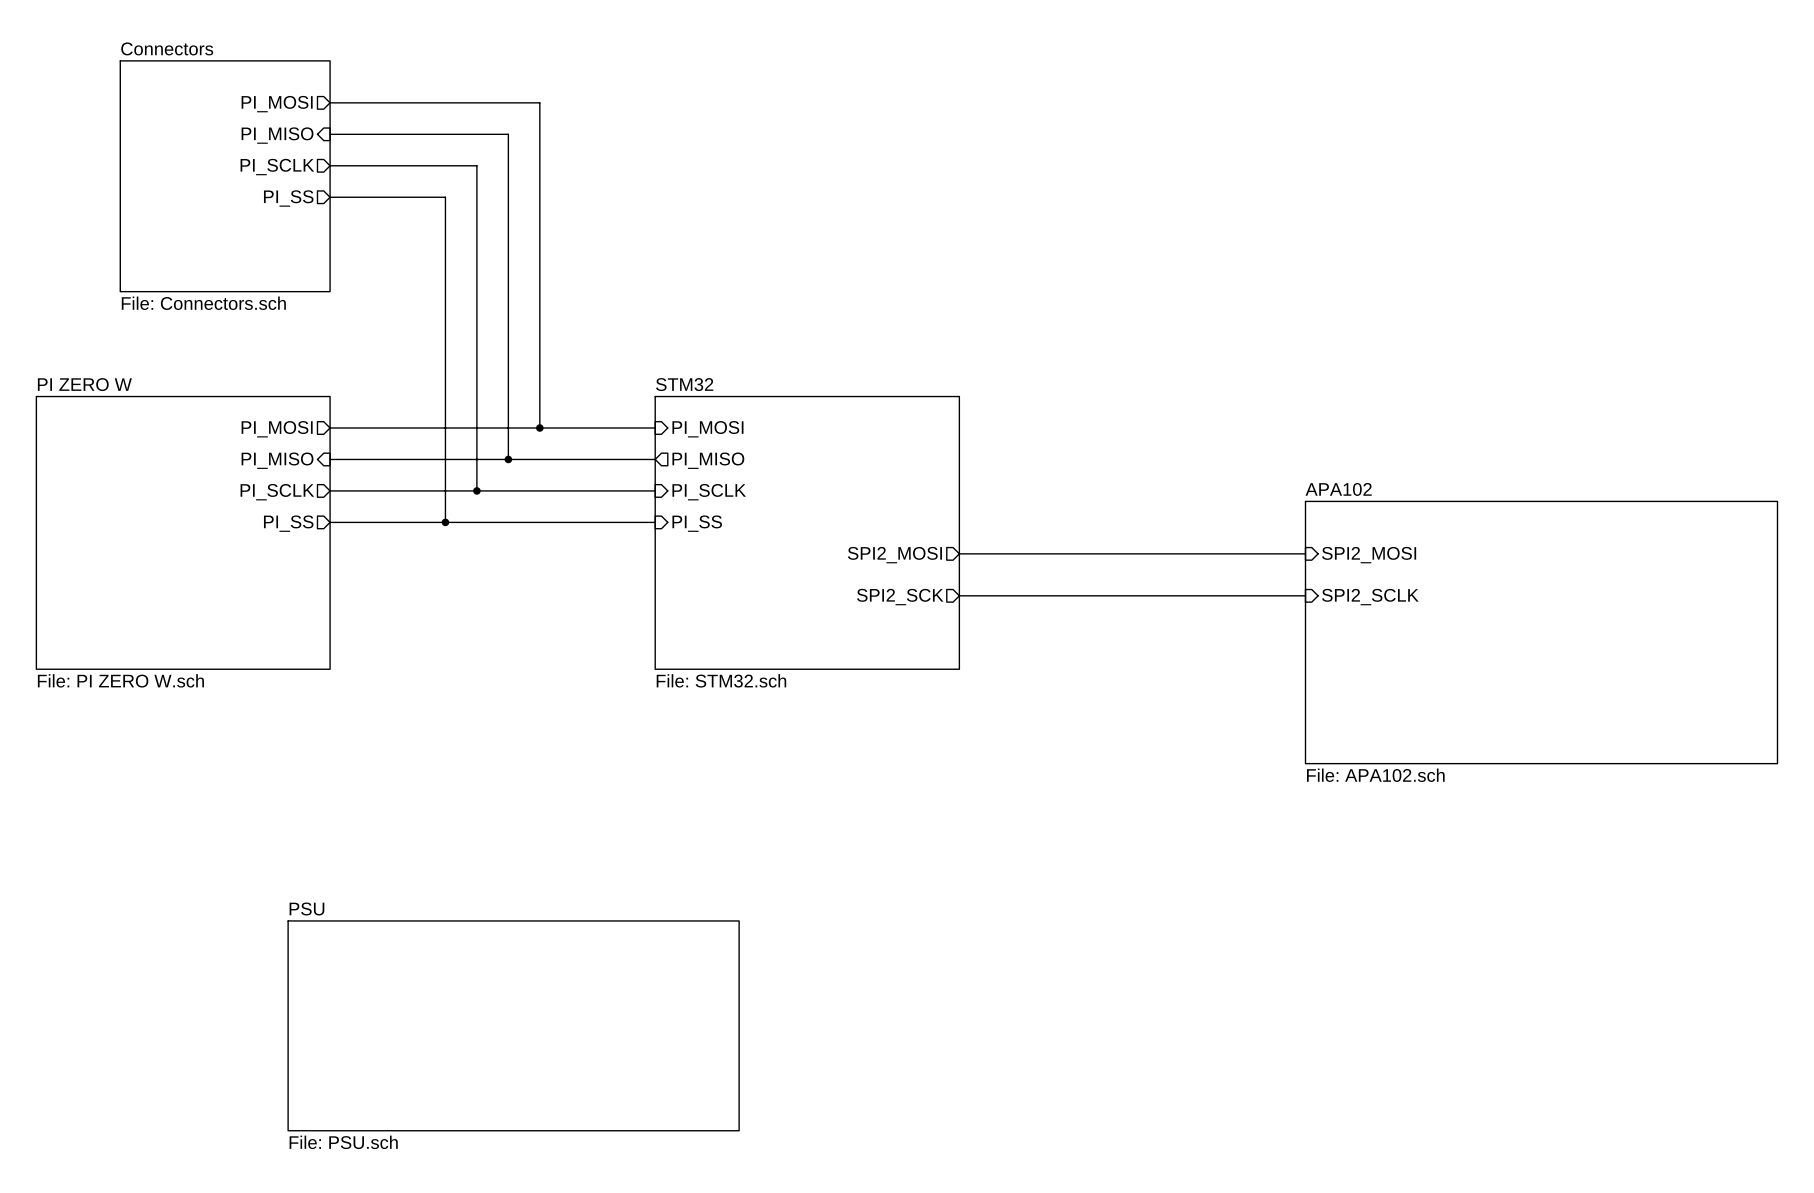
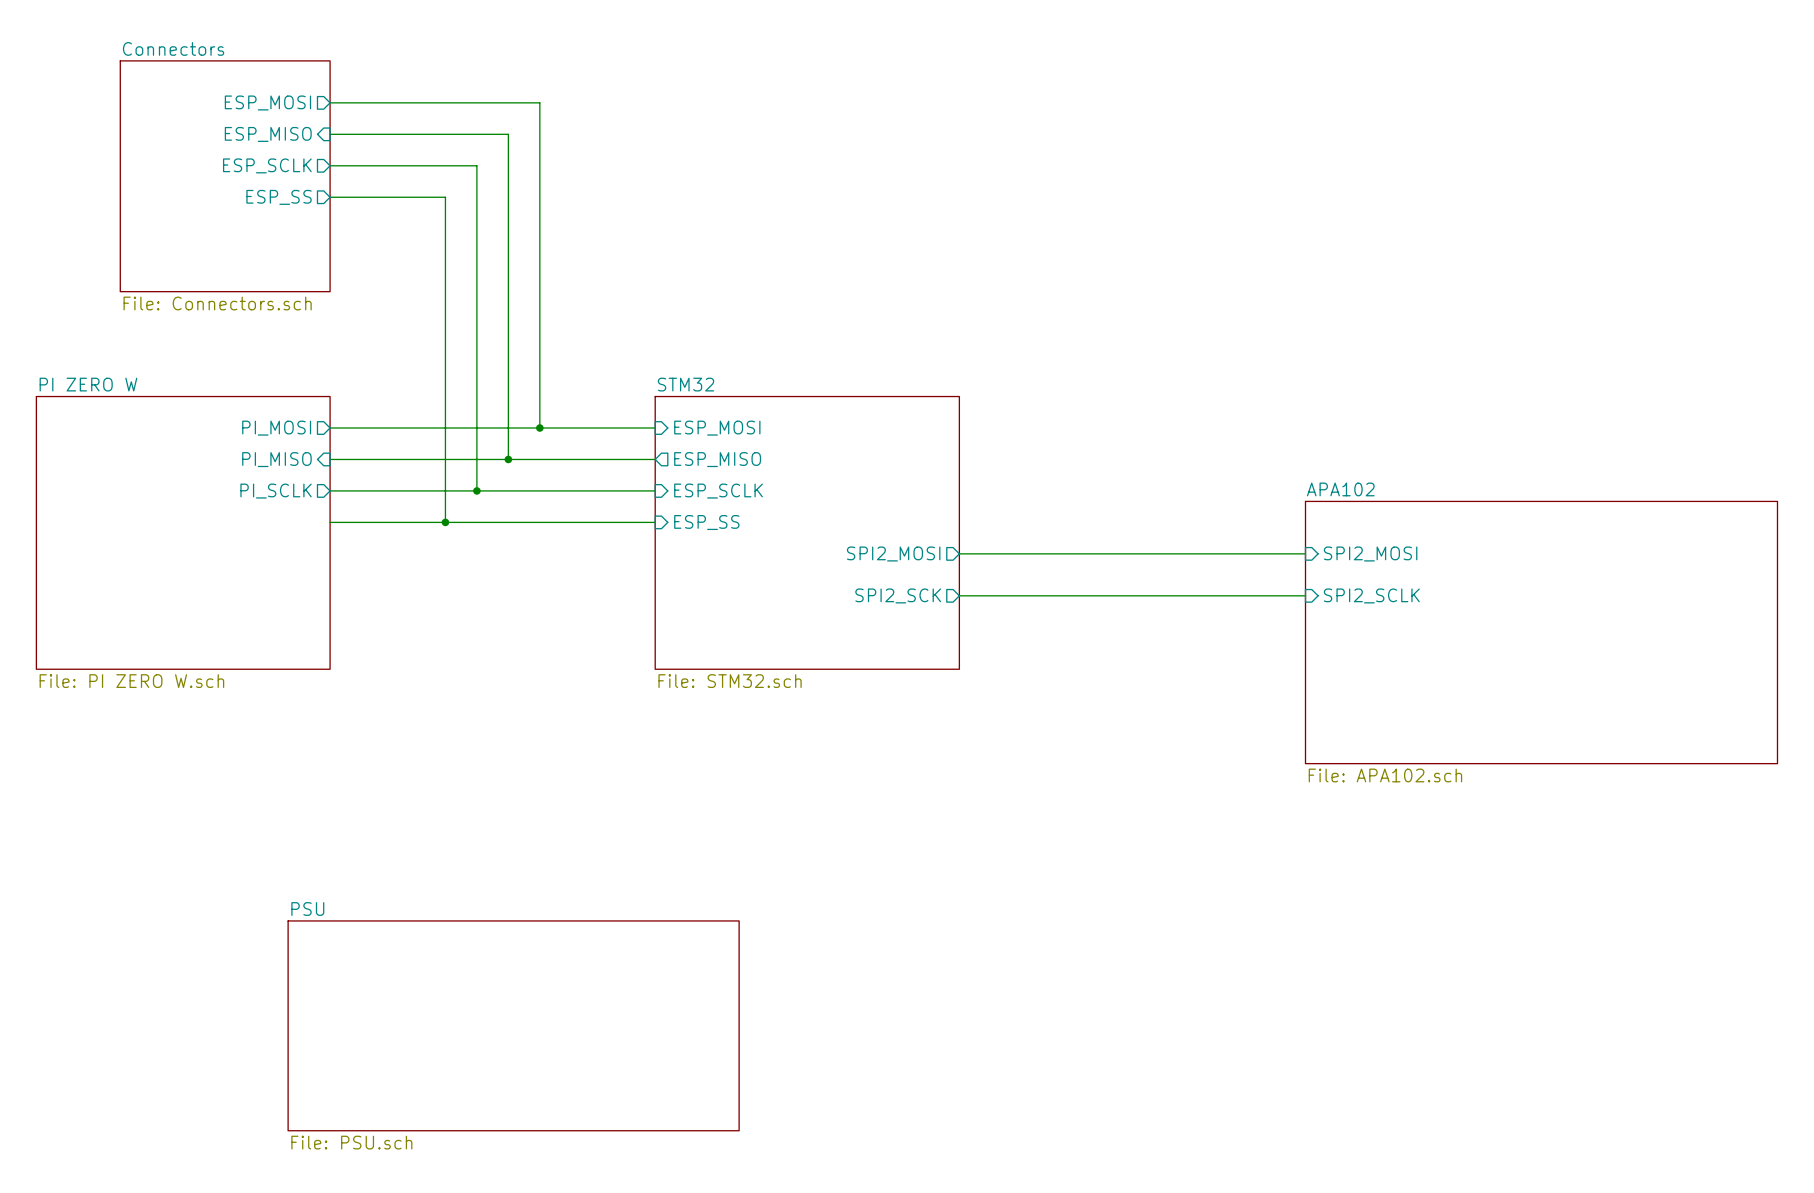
sheet pin: PI_MOSI (277, 104) -> ESP_MOSI (267, 102)
sheet pin: PI_MISO (277, 135) -> ESP_MISO (268, 134)
sheet pin: PI_SCLK (277, 167) -> ESP_SCLK (267, 165)
sheet pin: PI_SS (288, 198) -> ESP_SS (279, 197)
sheet pin: PI_MOSI (707, 429) -> ESP_MOSI (717, 428)
sheet pin: PI_MISO (708, 460) -> ESP_MISO (717, 459)
sheet pin: PI_SCLK (709, 492) -> ESP_SCLK (718, 491)
sheet pin: PI_SS (288, 523) -> none
sheet pin: PI_SS (697, 523) -> ESP_SS (706, 522)

